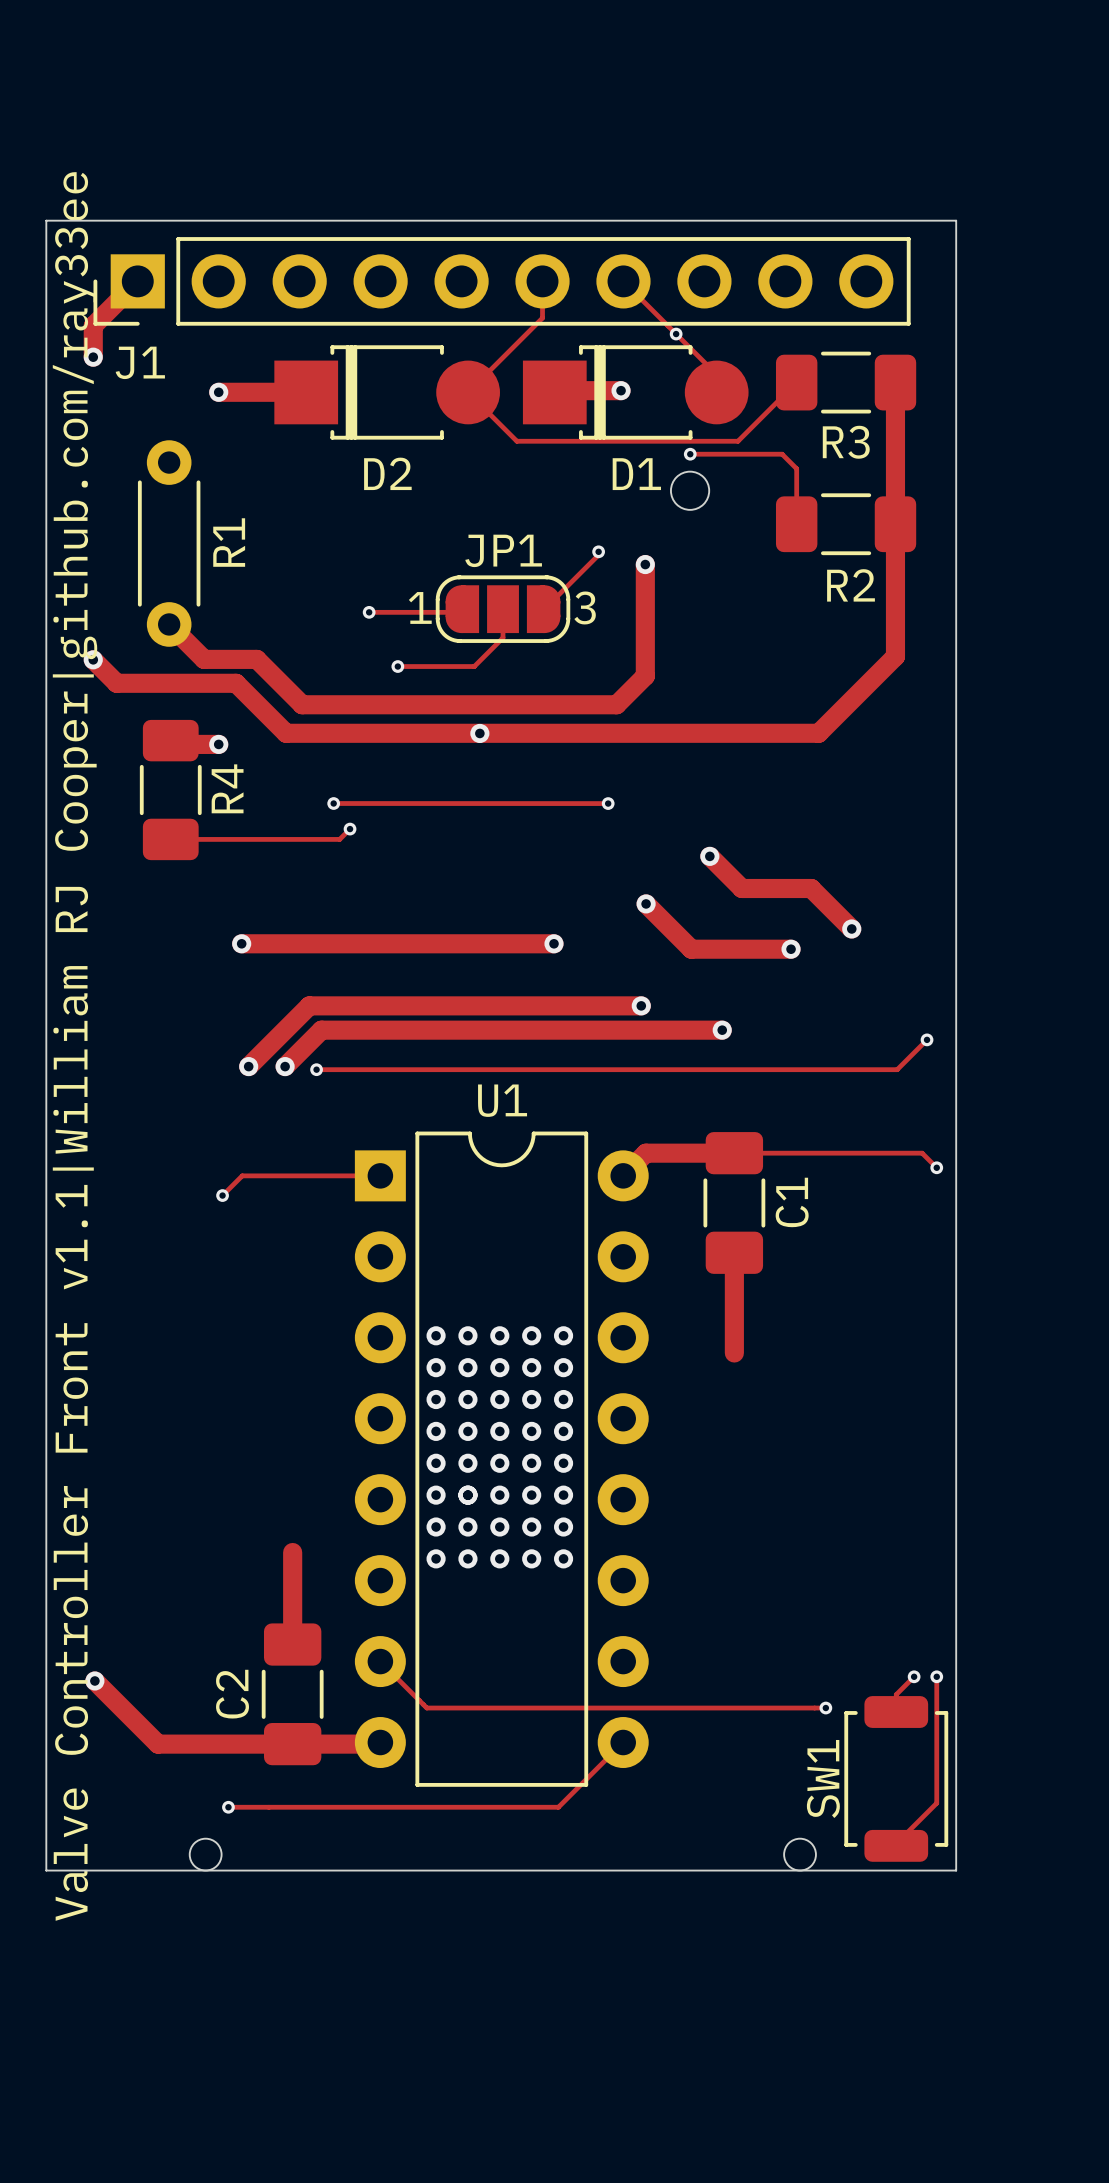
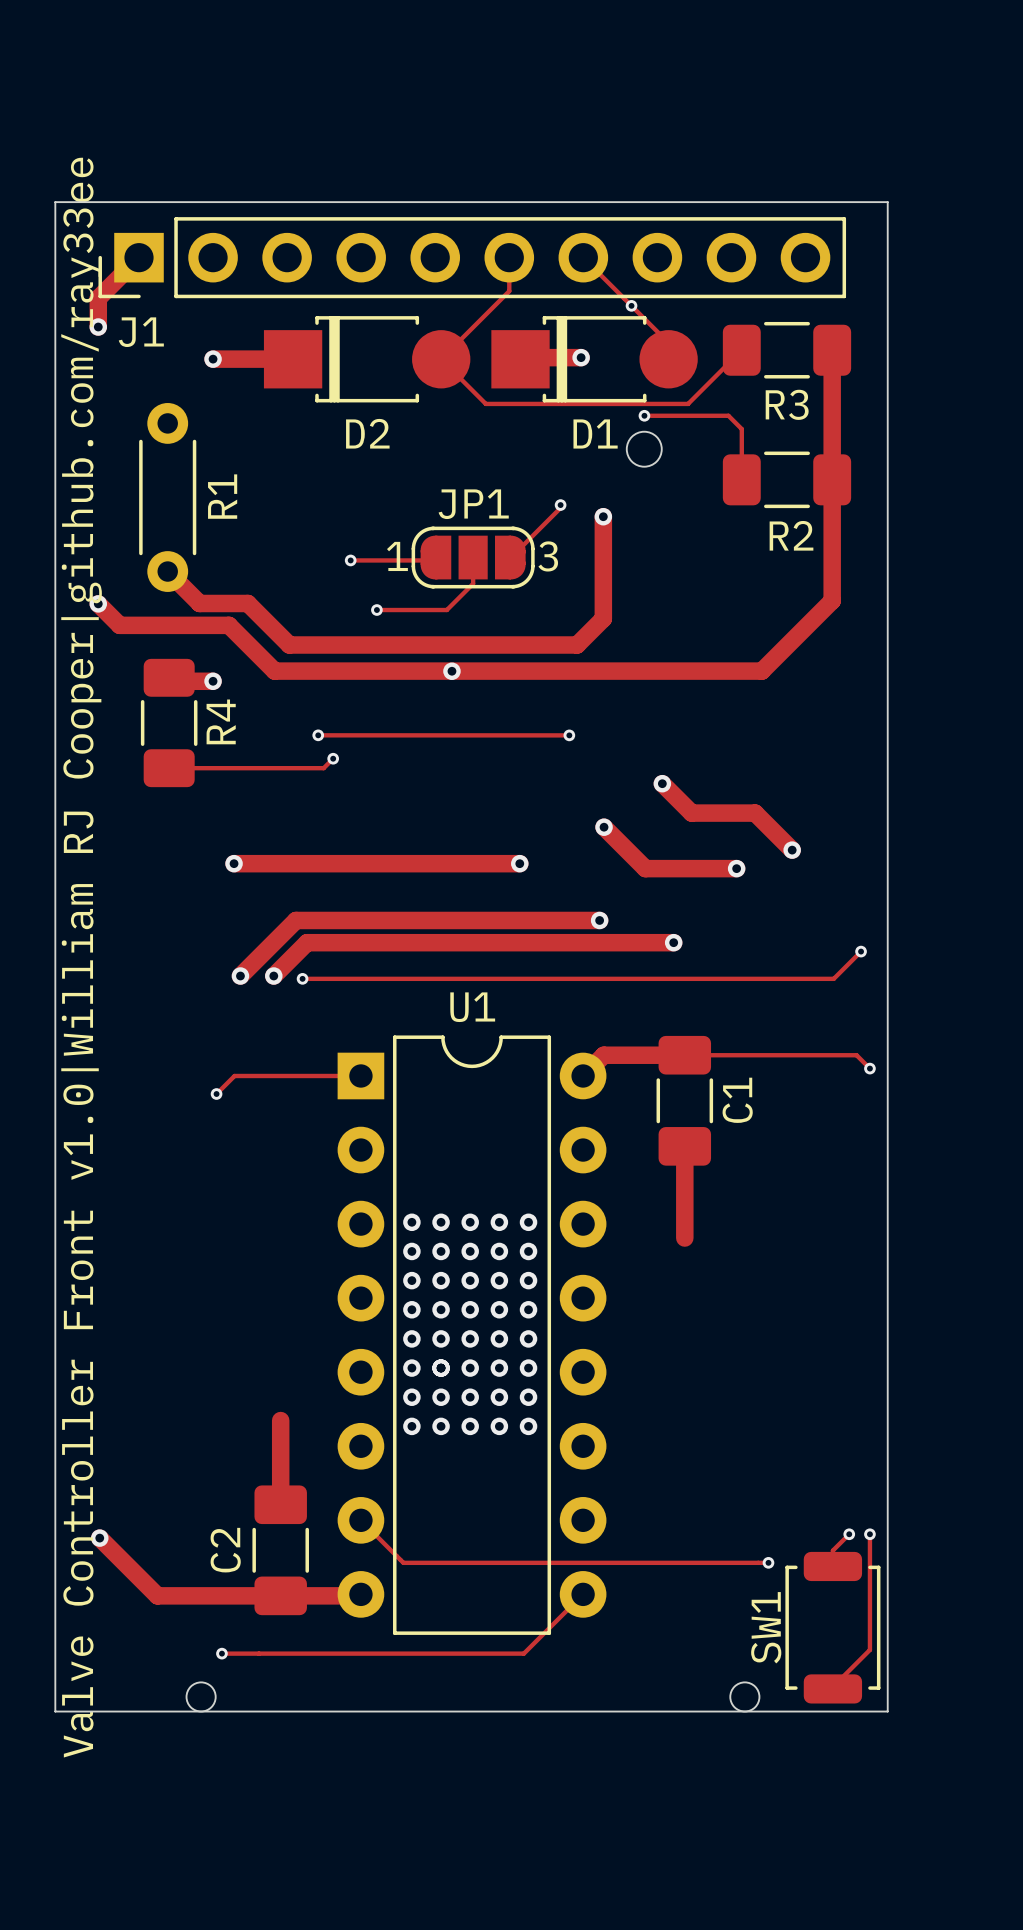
text: Valve Controller Front v1.1|William RJ Cooper|github.com/ray33ee (75, 1046) -> Valve Controller Front v1.0|William RJ Cooper|github.com/ray33ee (81, 957)

